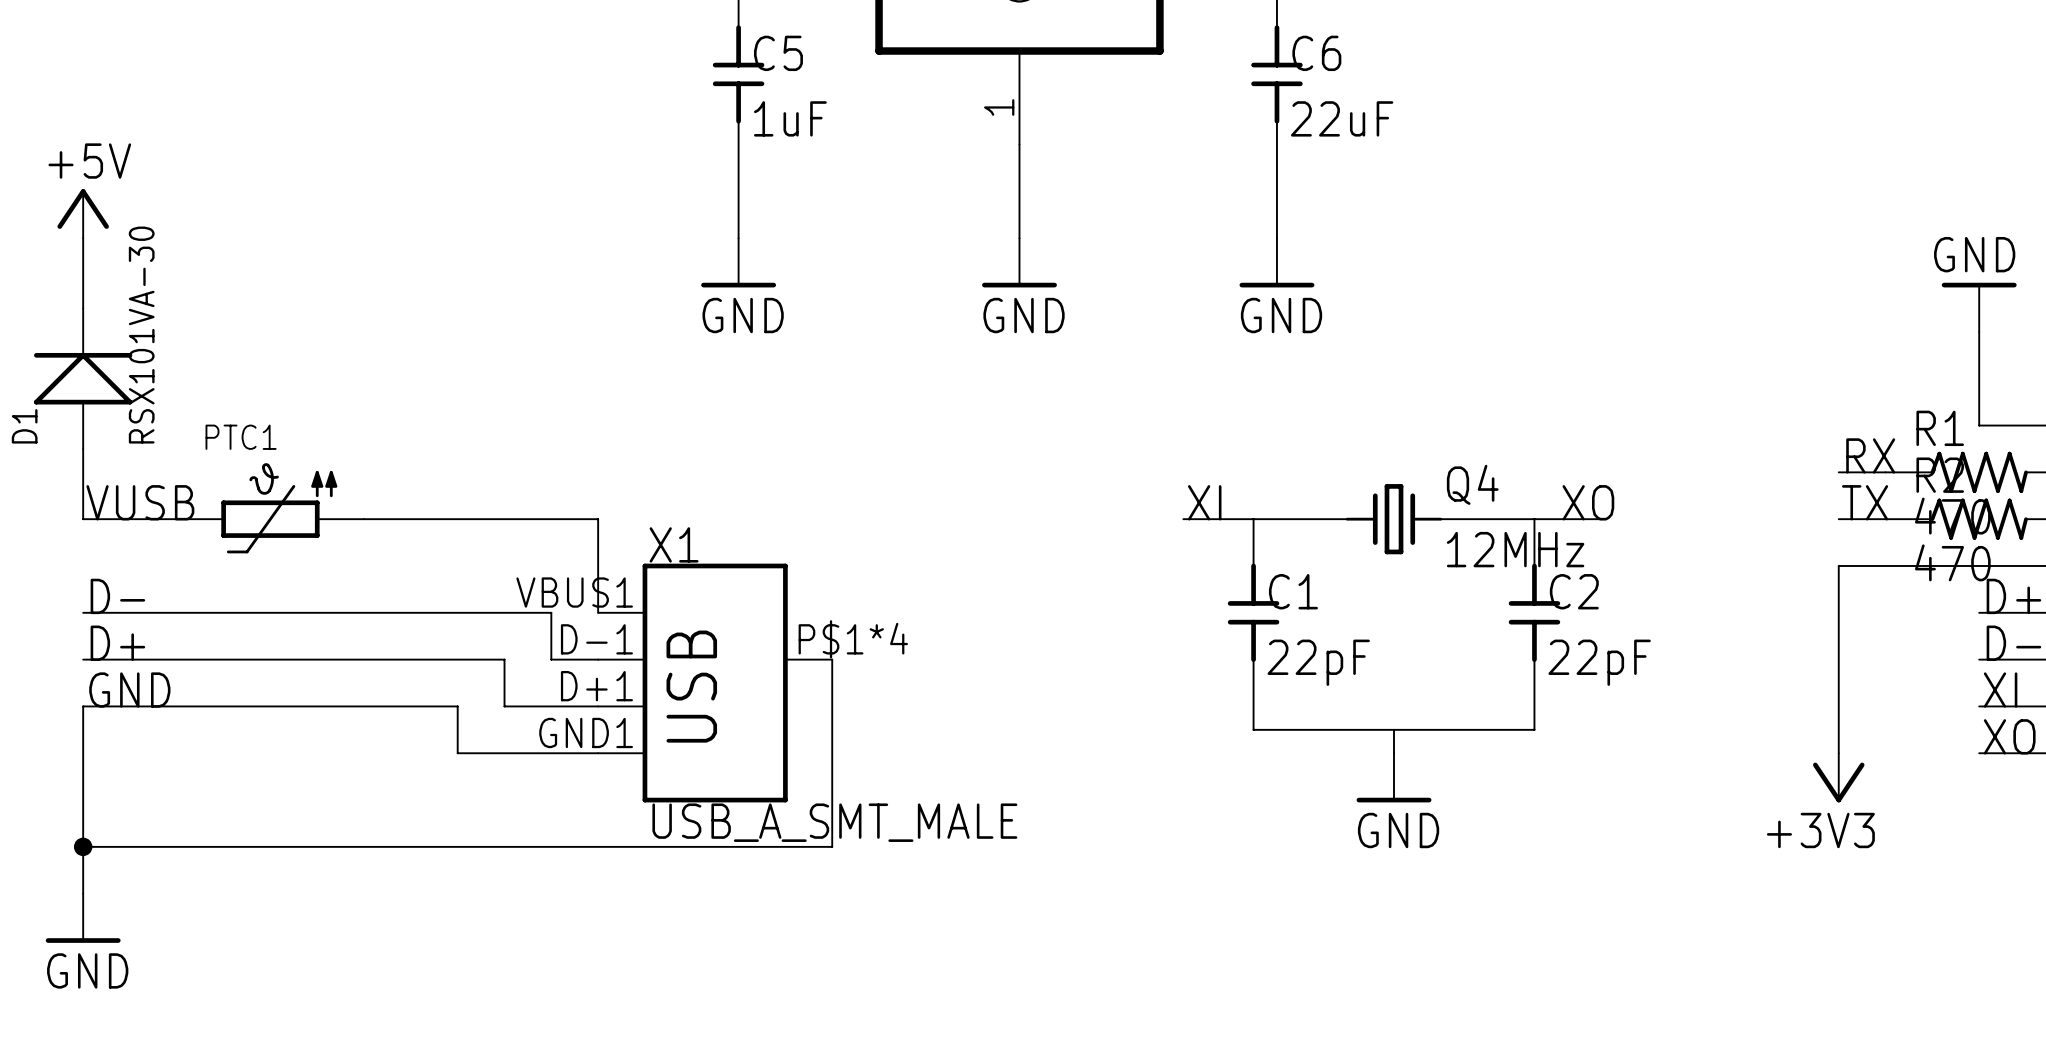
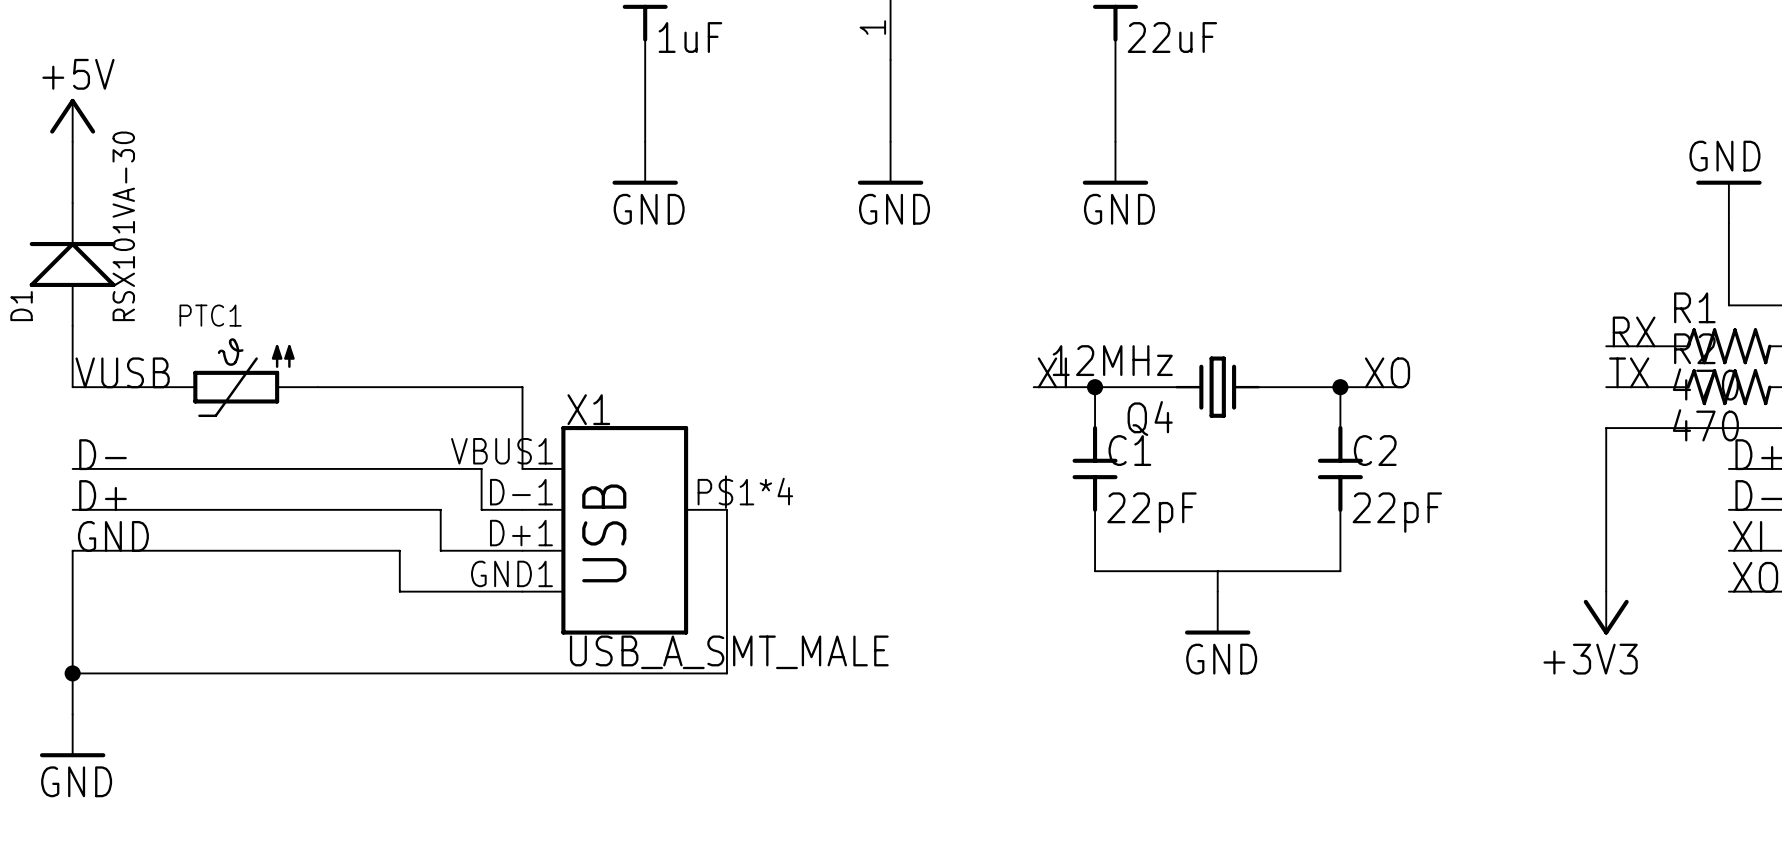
Q4 name position: Q4 (1472, 484) -> Q4 (1150, 418)
junction: none -> (1095, 387)
junction: none -> (1340, 387)
Q4 value position: 12MHz (1515, 549) -> 12MHz (1112, 360)

